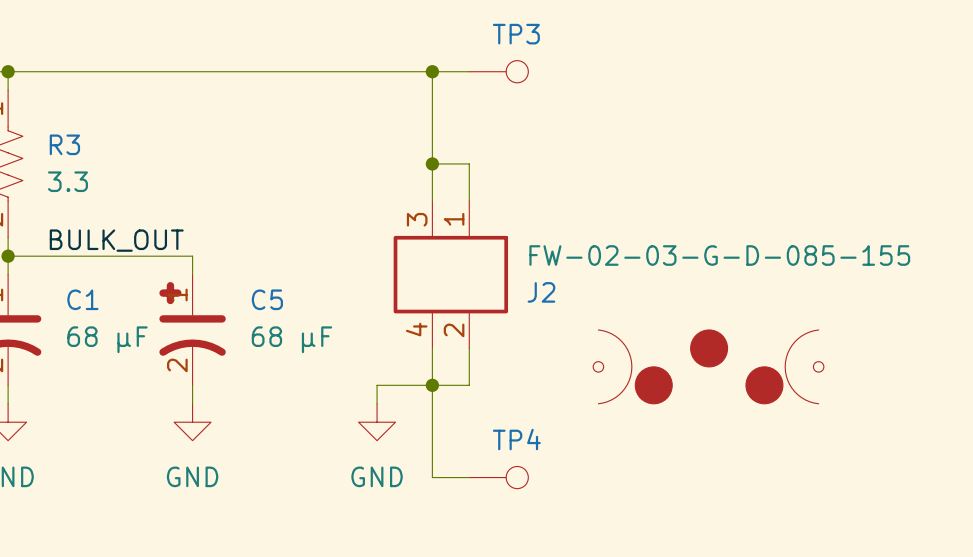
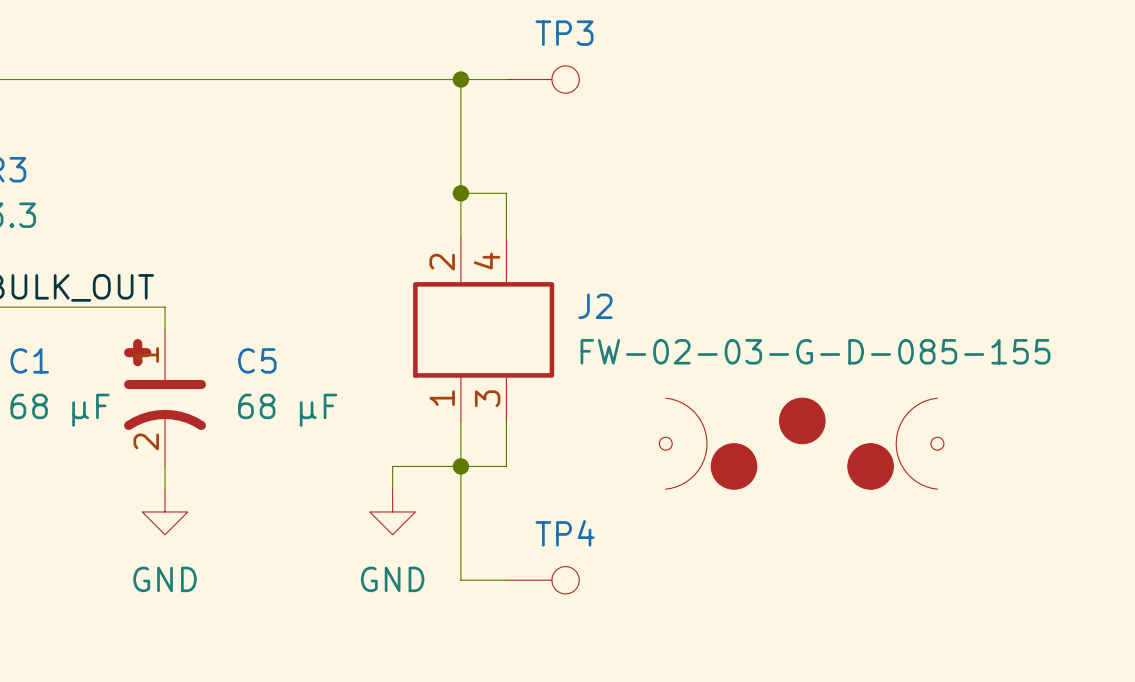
J2 value position: FW-02-03-G-D-085-155 (719, 255) -> FW-02-03-G-D-085-155 (815, 351)
J2 rotation: 0° (450, 274) -> 180° (483, 329)
J2 name position: J2 (541, 292) -> J2 (595, 306)

